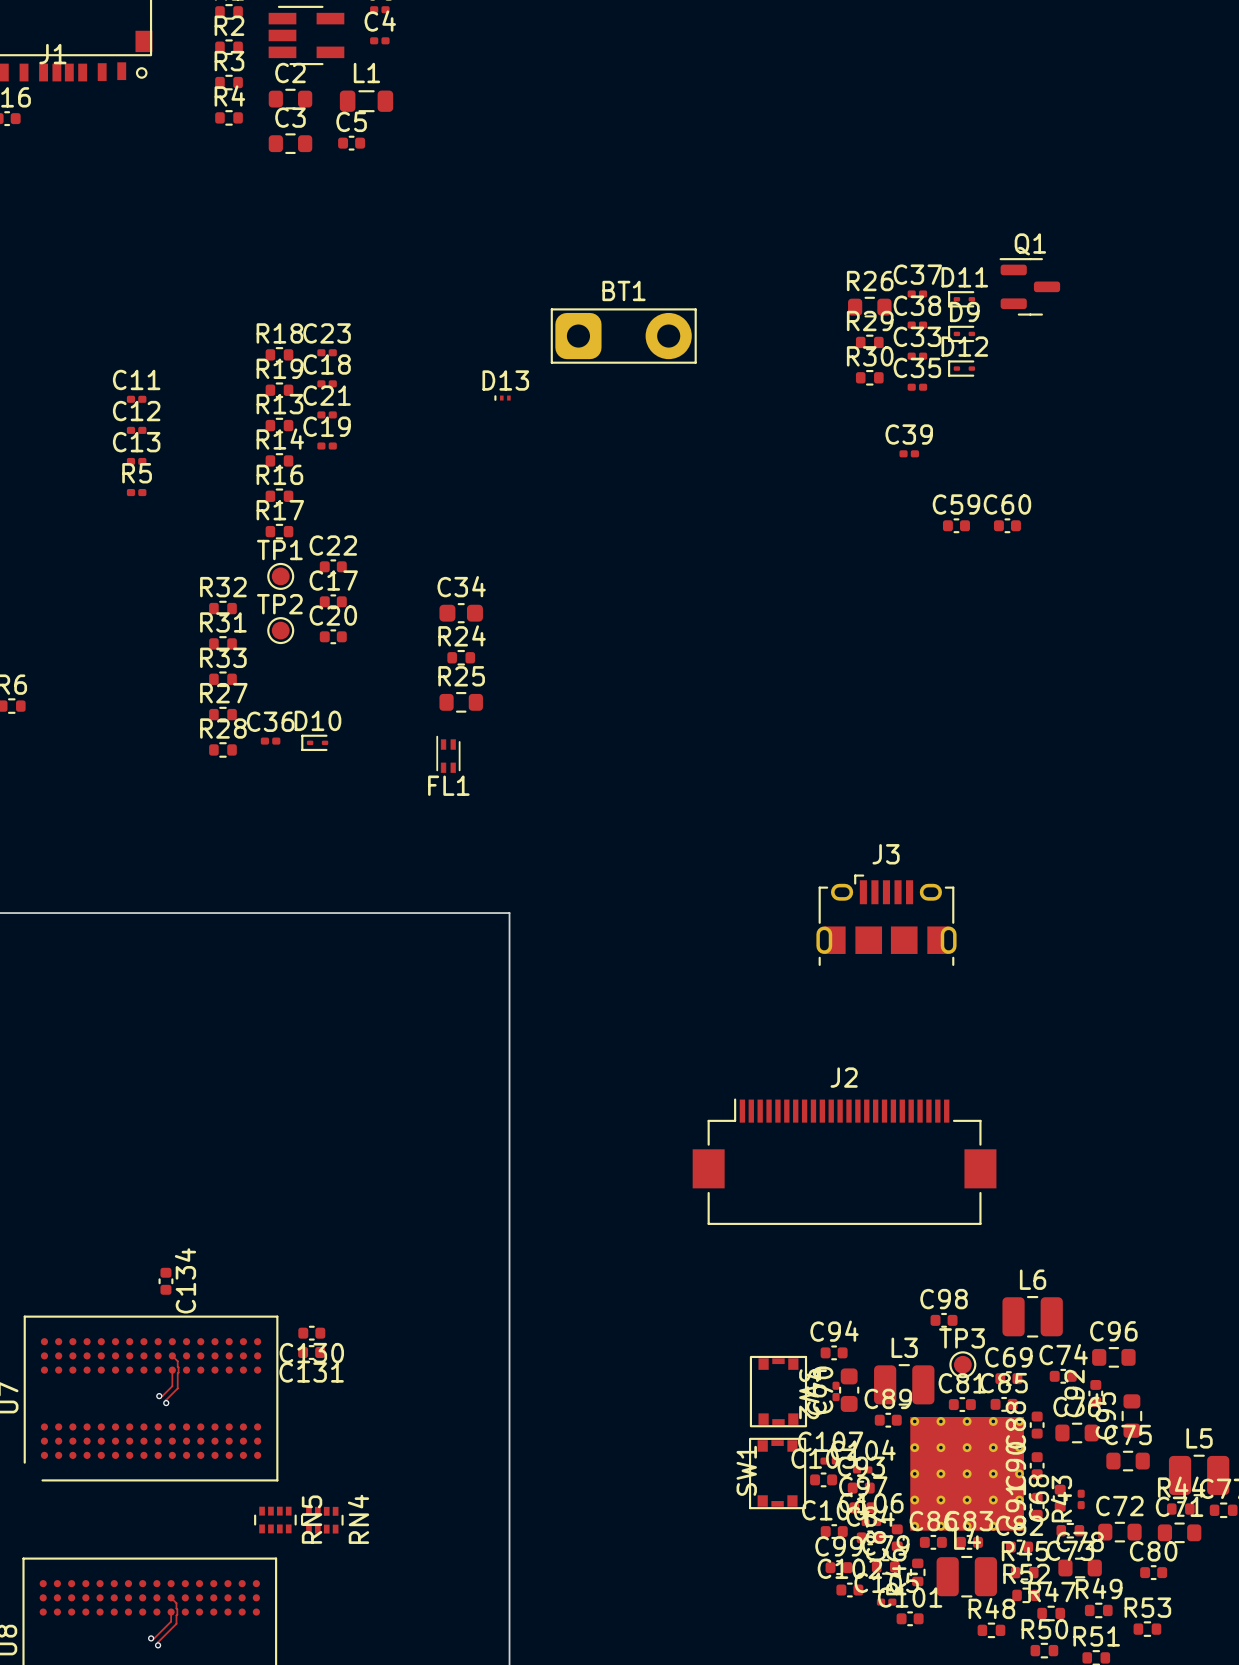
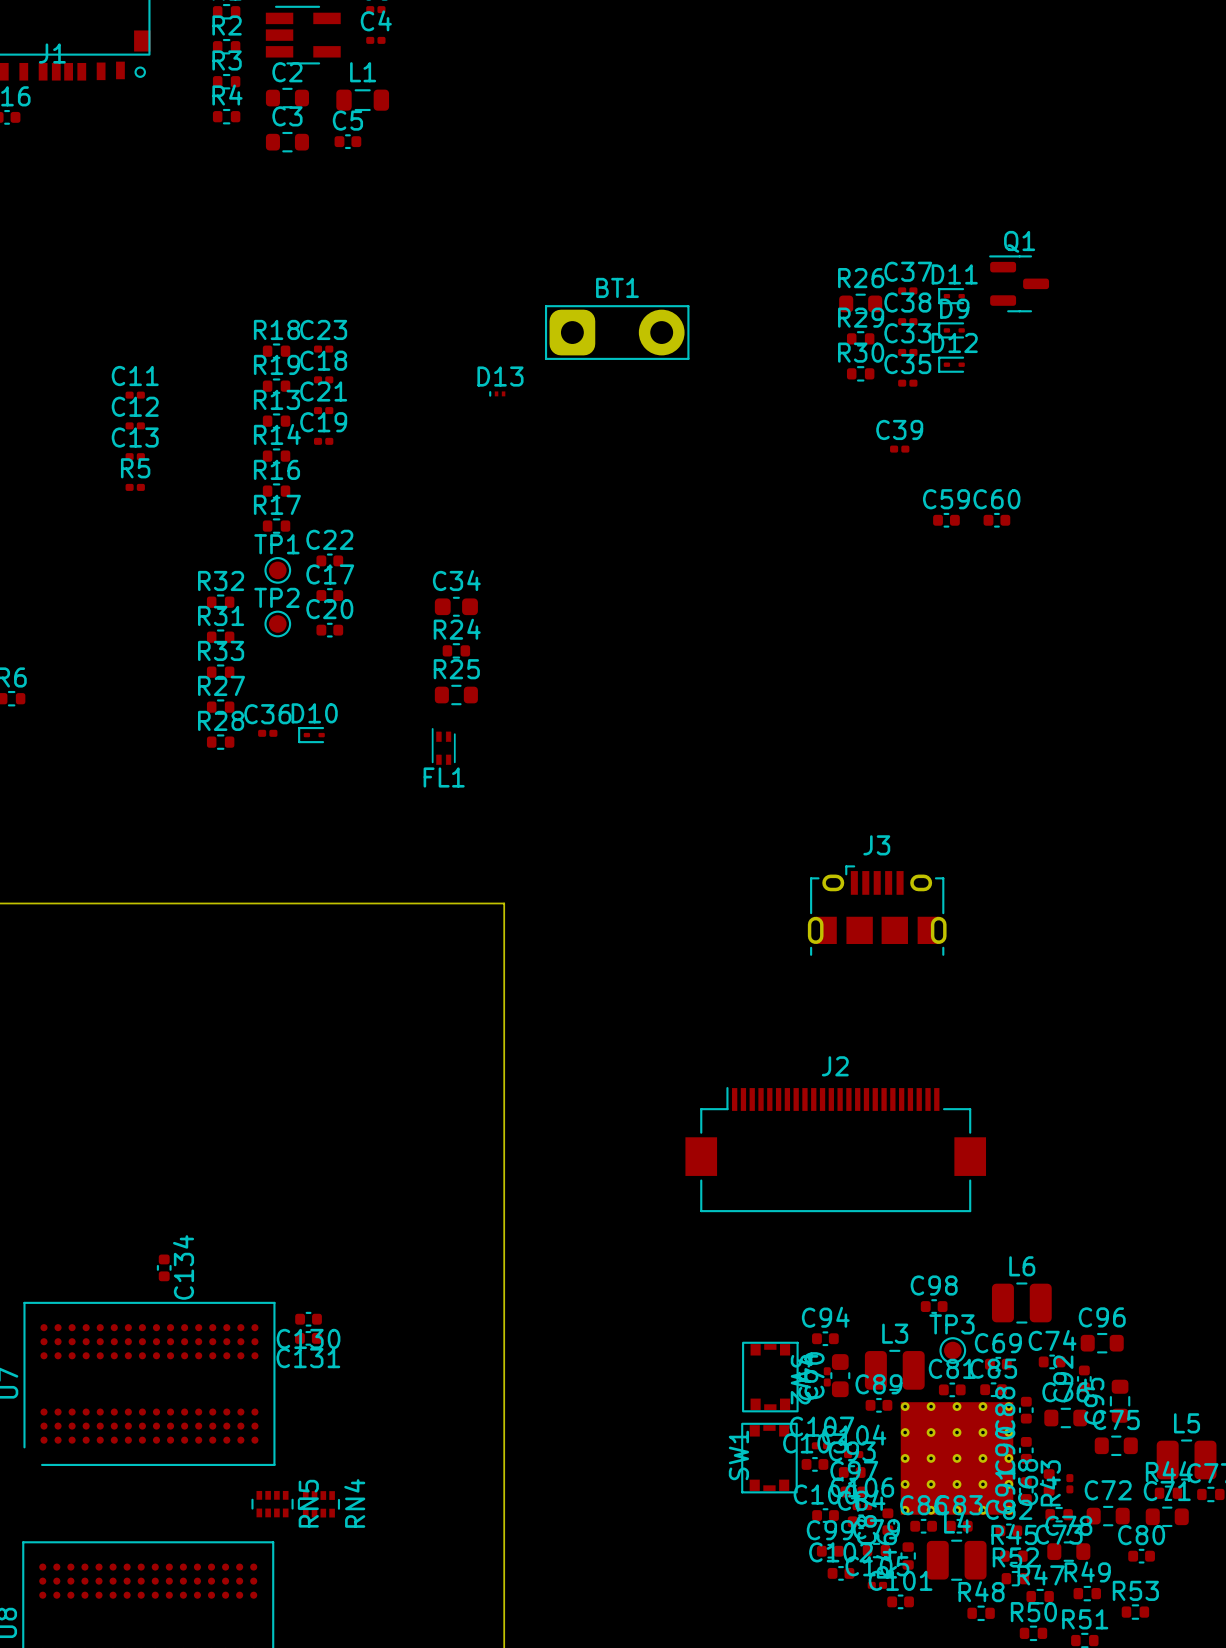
track: (172, 1355) (177, 1361) (177, 1388) (166, 1399) (166, 1403) -> none
track: (172, 1370) (172, 1386) (162, 1396) (159, 1396) -> none
via: (159, 1396) -> none
via: (166, 1403) -> none
track: (171, 1597) (176, 1603) (176, 1623) (158, 1642) (158, 1645) -> none
track: (171, 1612) (171, 1621) (154, 1638) (151, 1638) -> none
via: (151, 1638) -> none
via: (158, 1645) -> none

